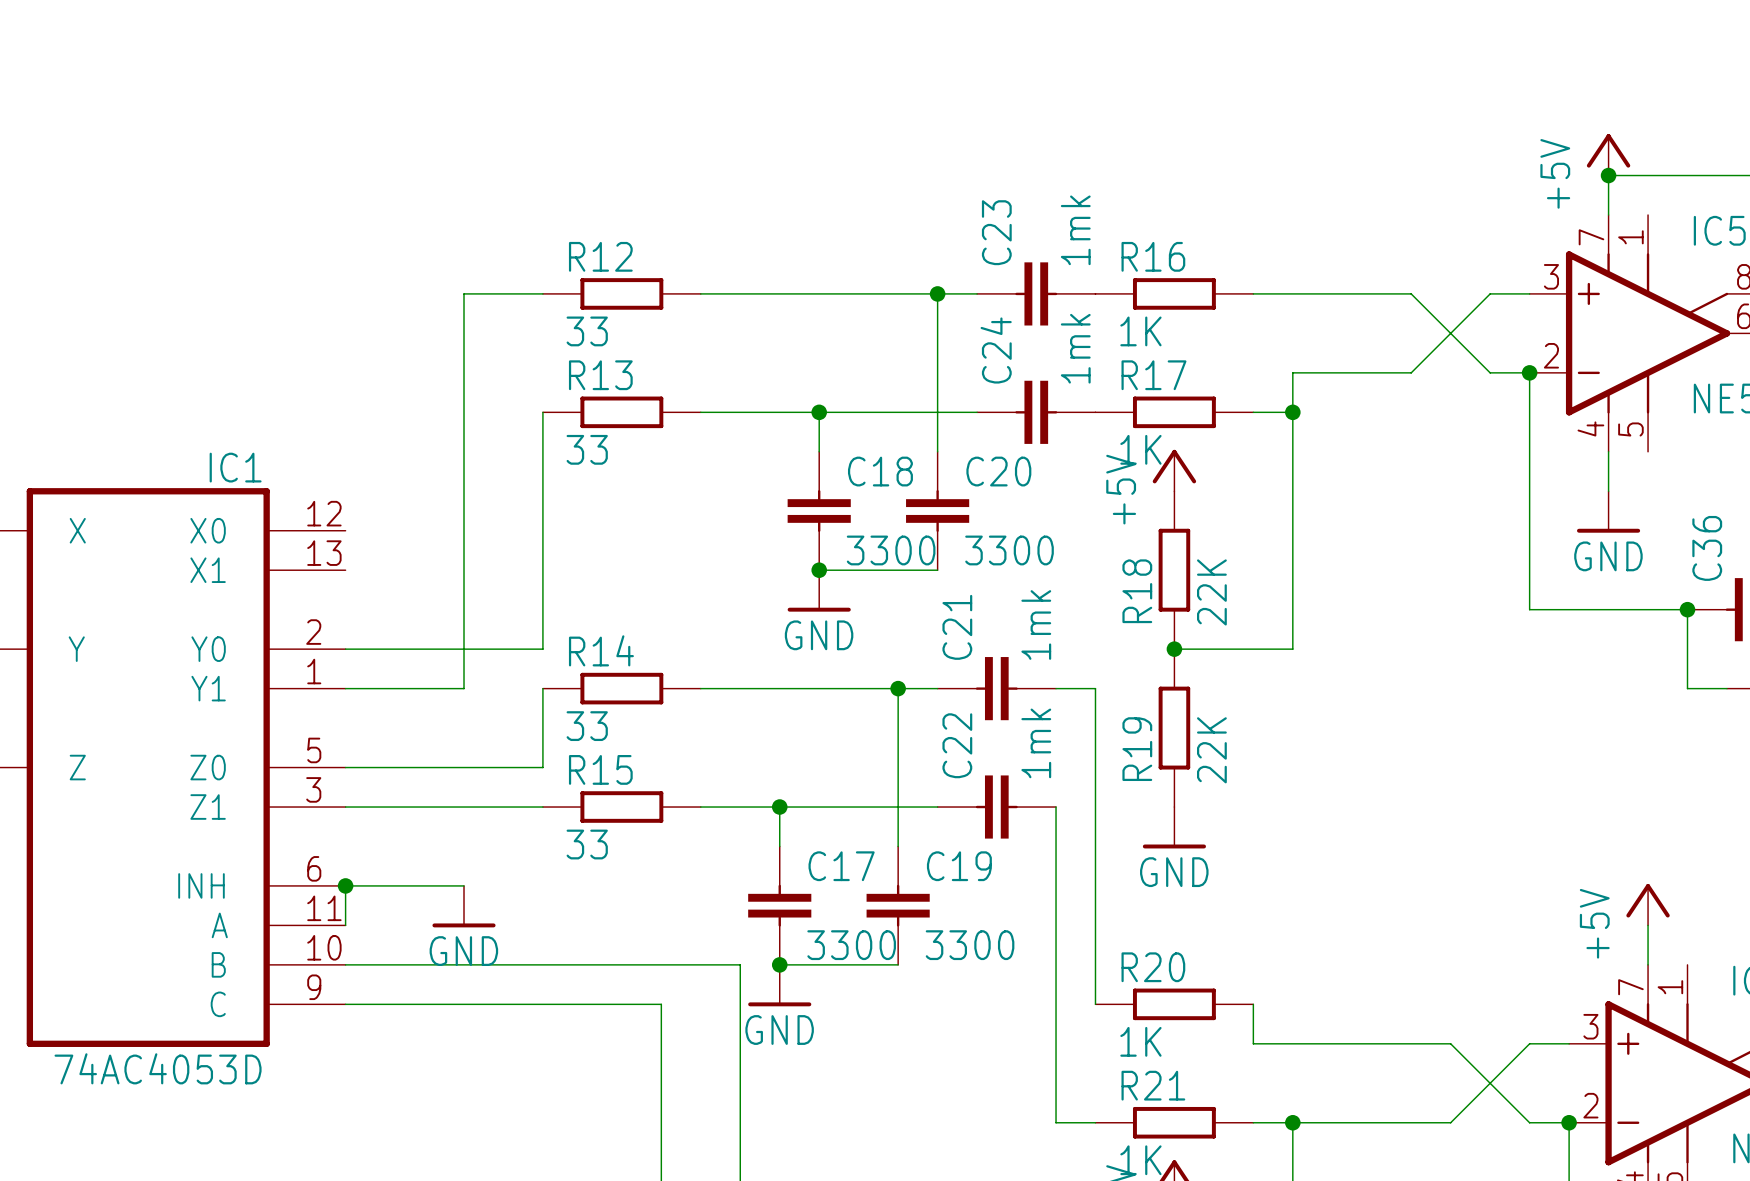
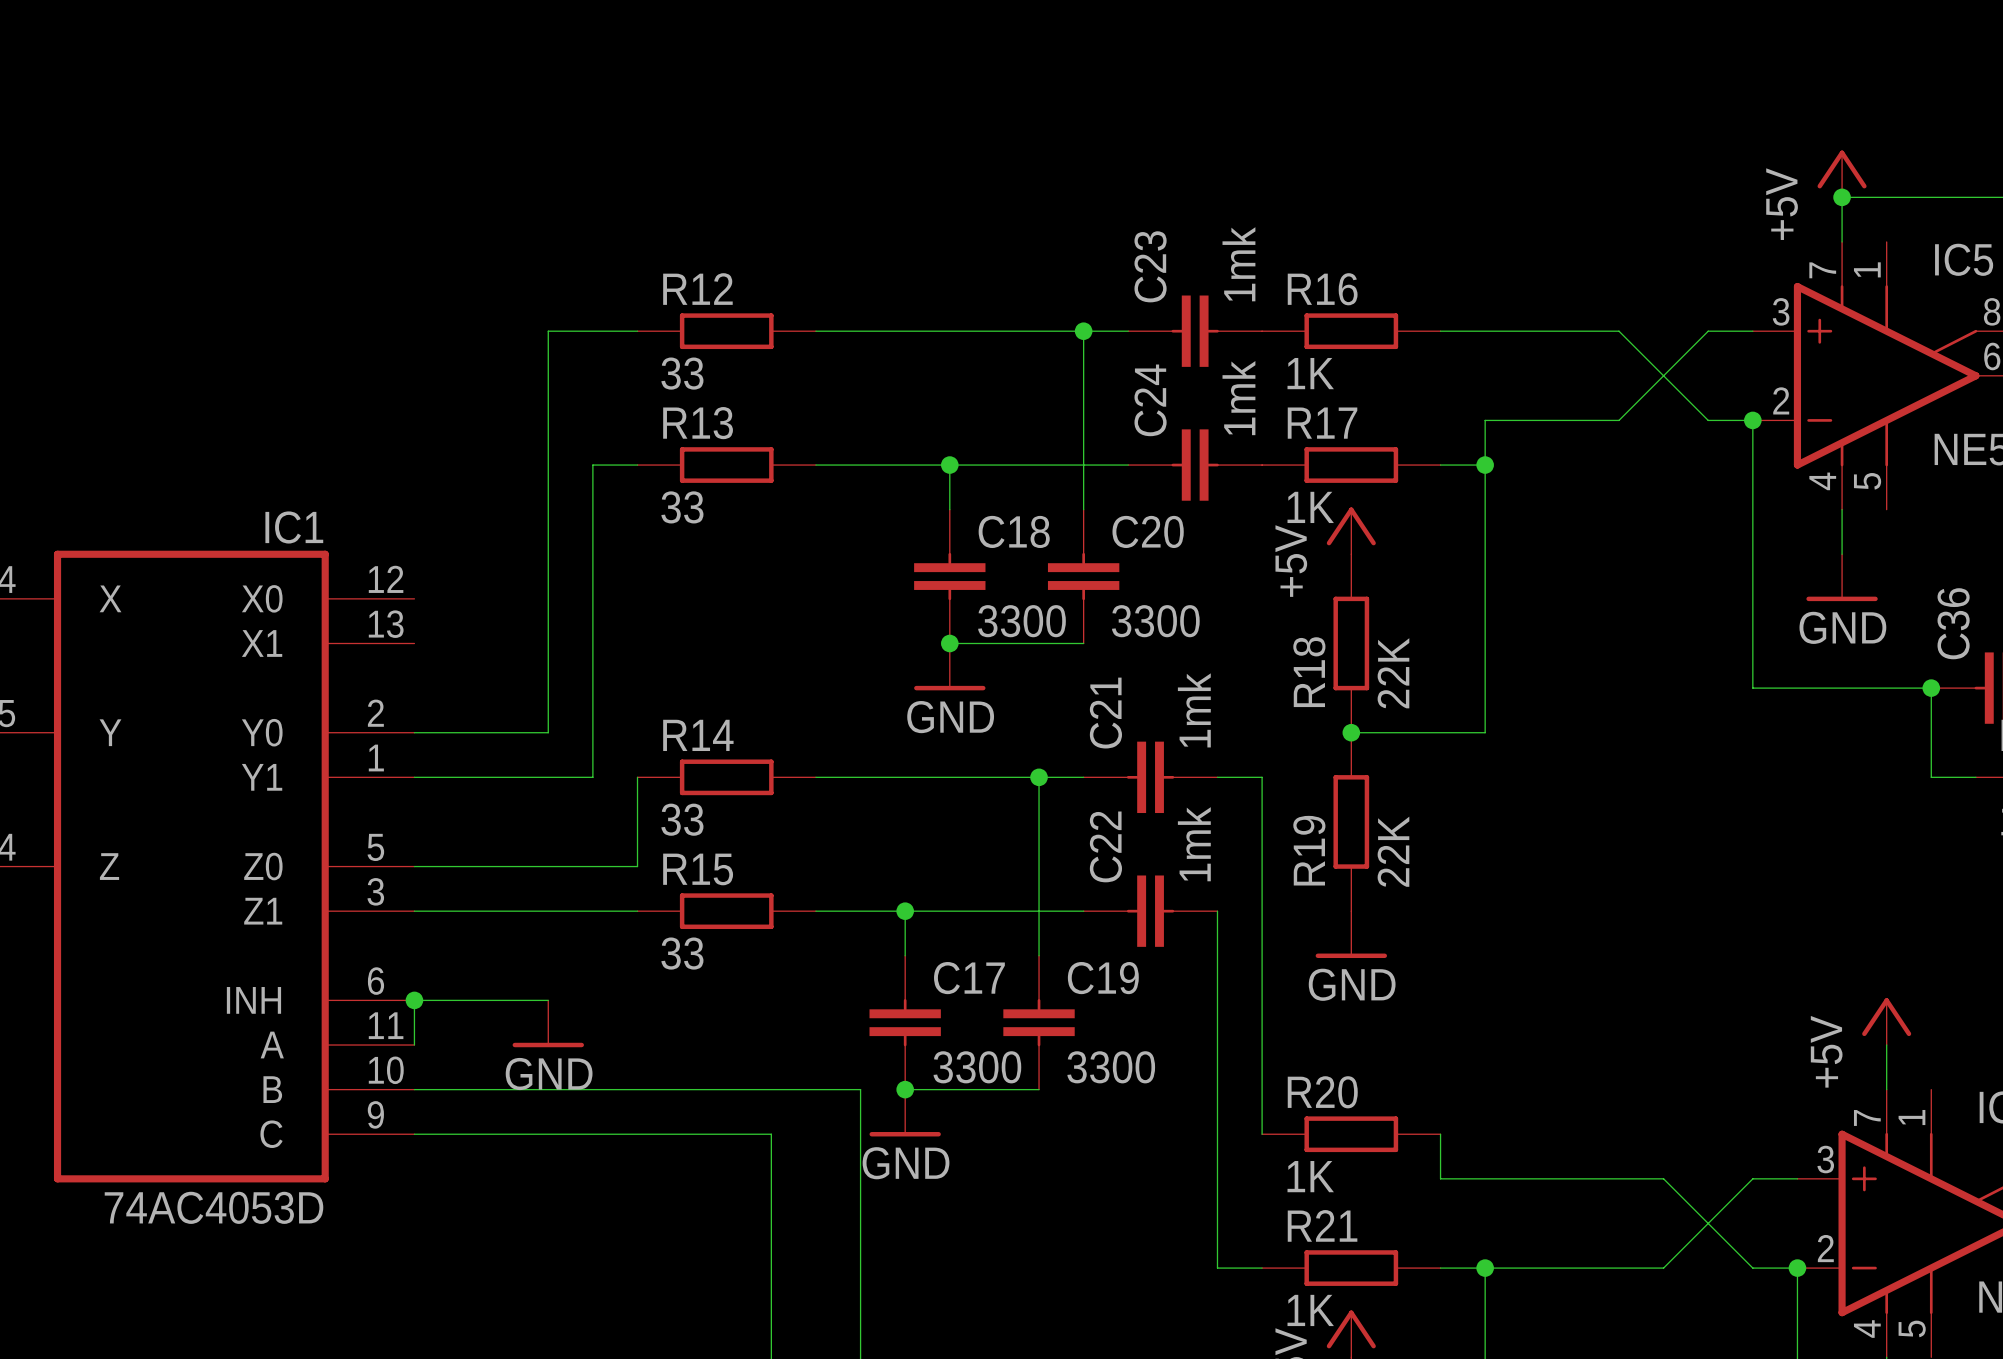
wire: (542, 412) (542, 649) (464, 649) (464, 688) -> (637, 465) (592, 465) (592, 777) (548, 777)

